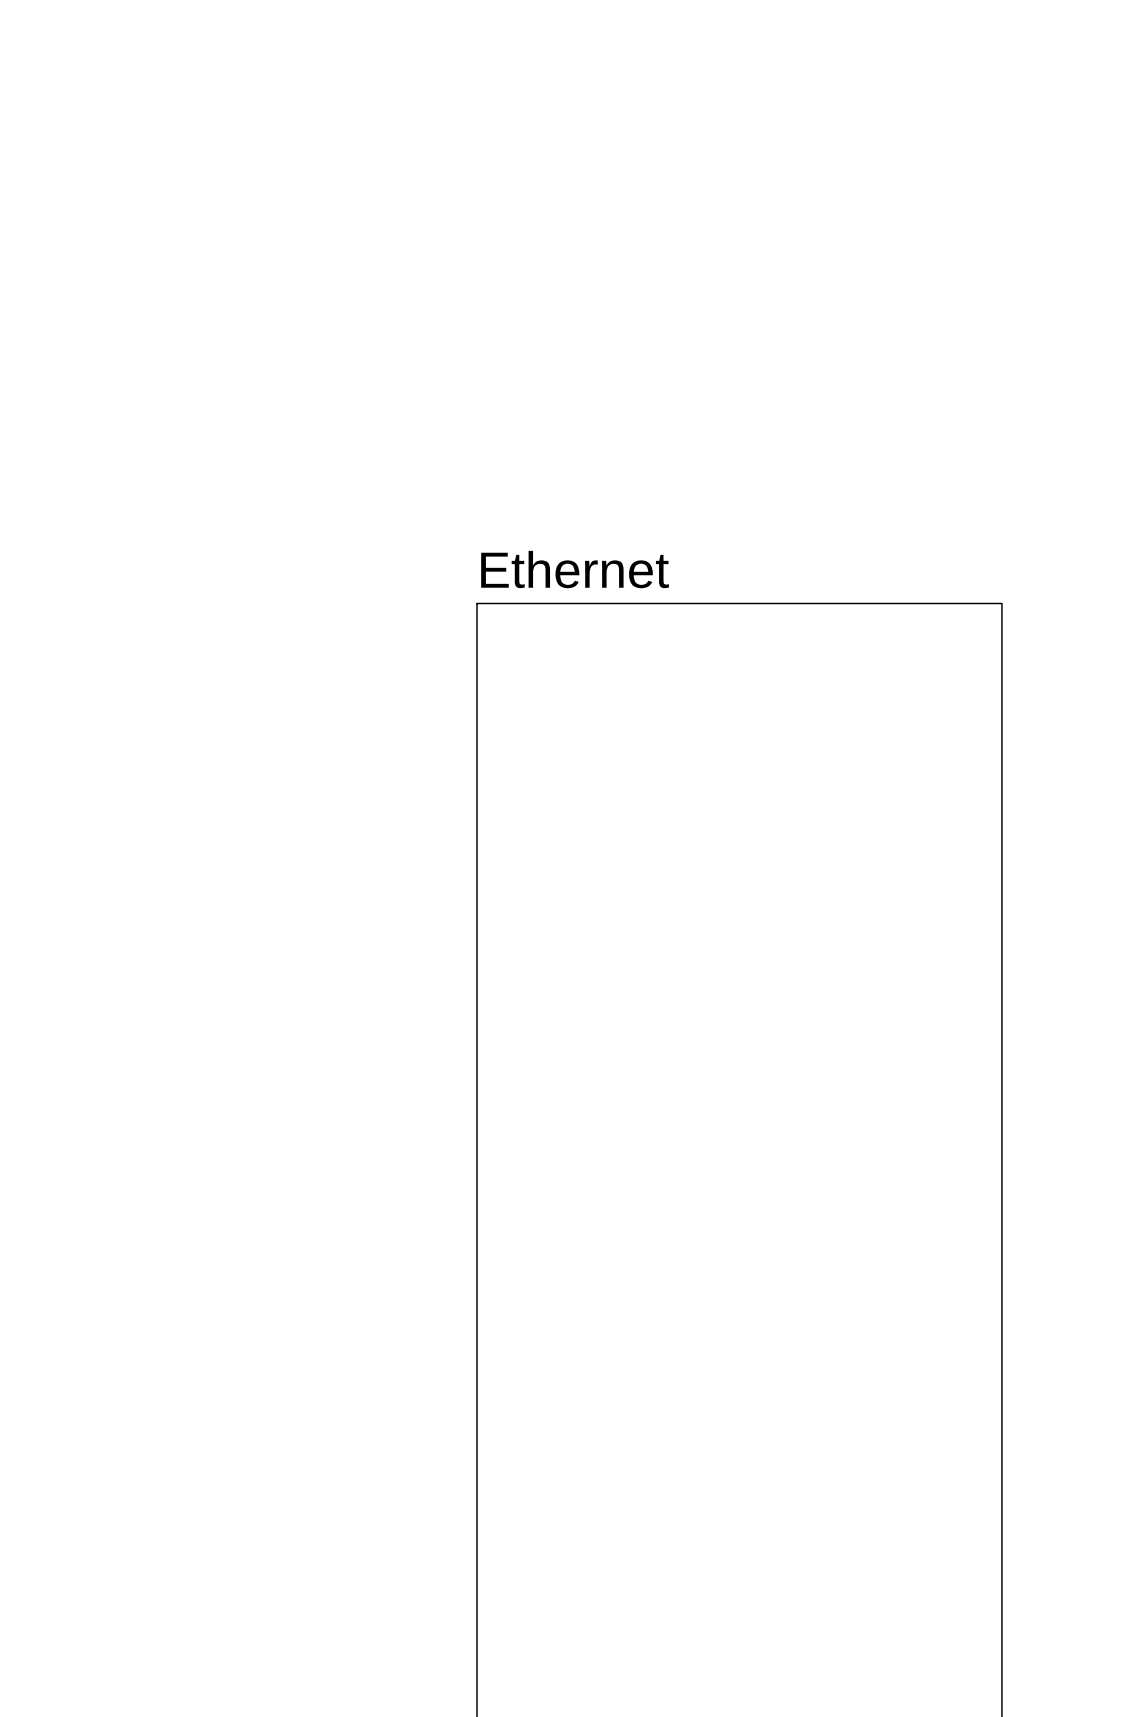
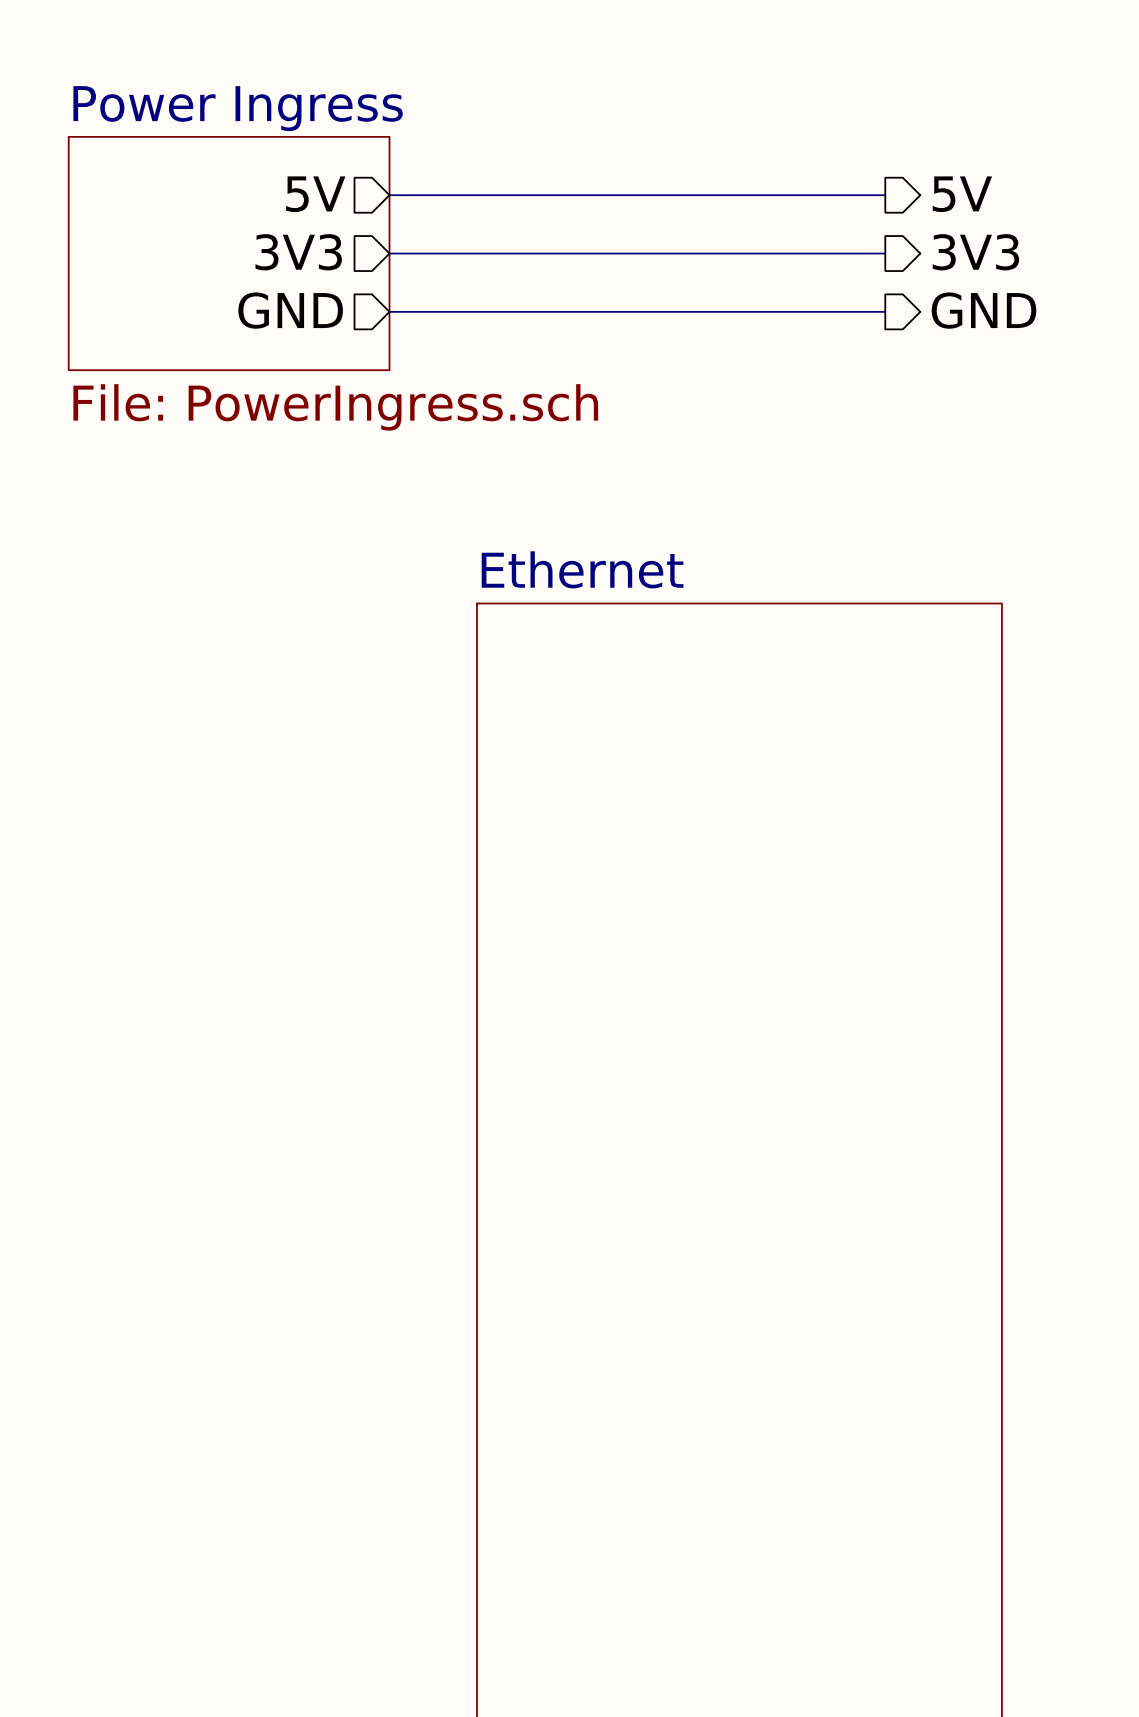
sheet pin: none -> 5V (315, 194)
sheet pin: none -> 5V (962, 194)
wire: none -> (389, 195) (885, 195)
sheet pin: none -> 3V3 (298, 252)
sheet pin: none -> 3V3 (975, 252)
sheet Power Ingress: none -> File: PowerIngress.sch (229, 253)
wire: none -> (389, 253) (885, 253)
sheet pin: none -> GND (290, 310)
sheet pin: none -> GND (984, 310)
wire: none -> (389, 311) (885, 311)

